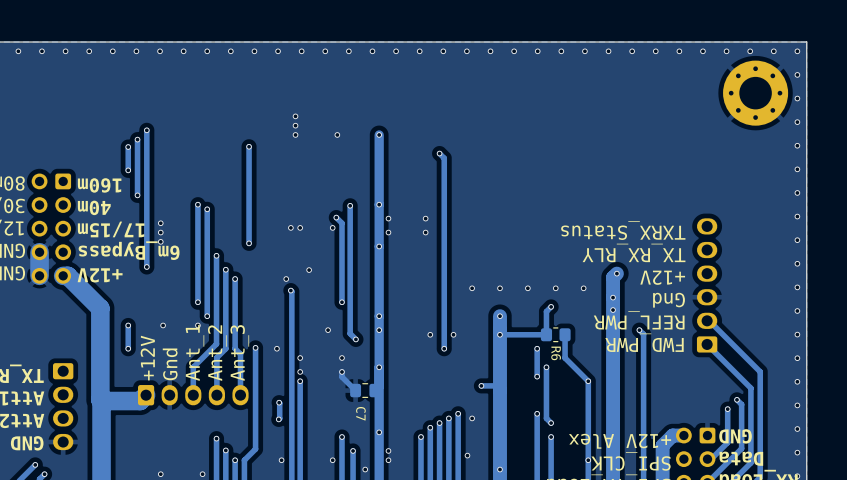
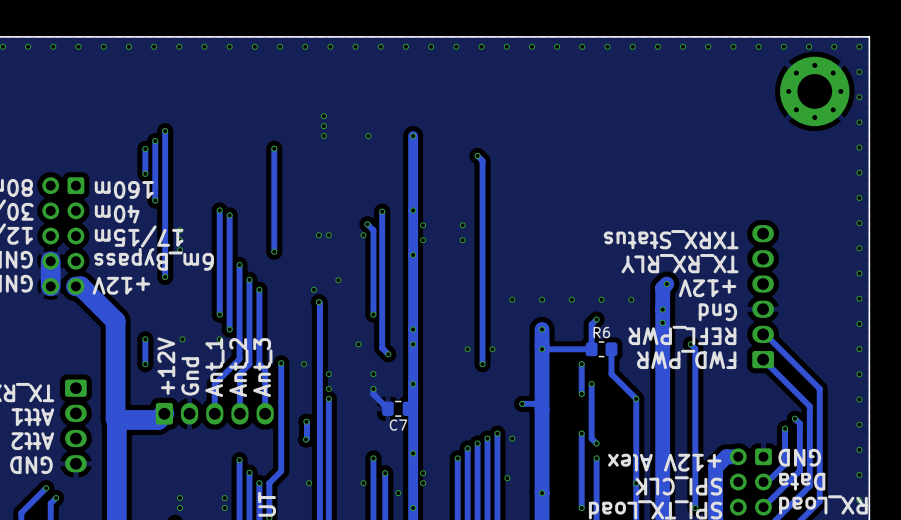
R6 name rotation: 0° (556, 353) -> 90° counterclockwise (601, 332)
R6 name position: R6 (556, 353) -> R6 (601, 332)
C7 name rotation: 0° (360, 413) -> 90° counterclockwise (398, 425)

